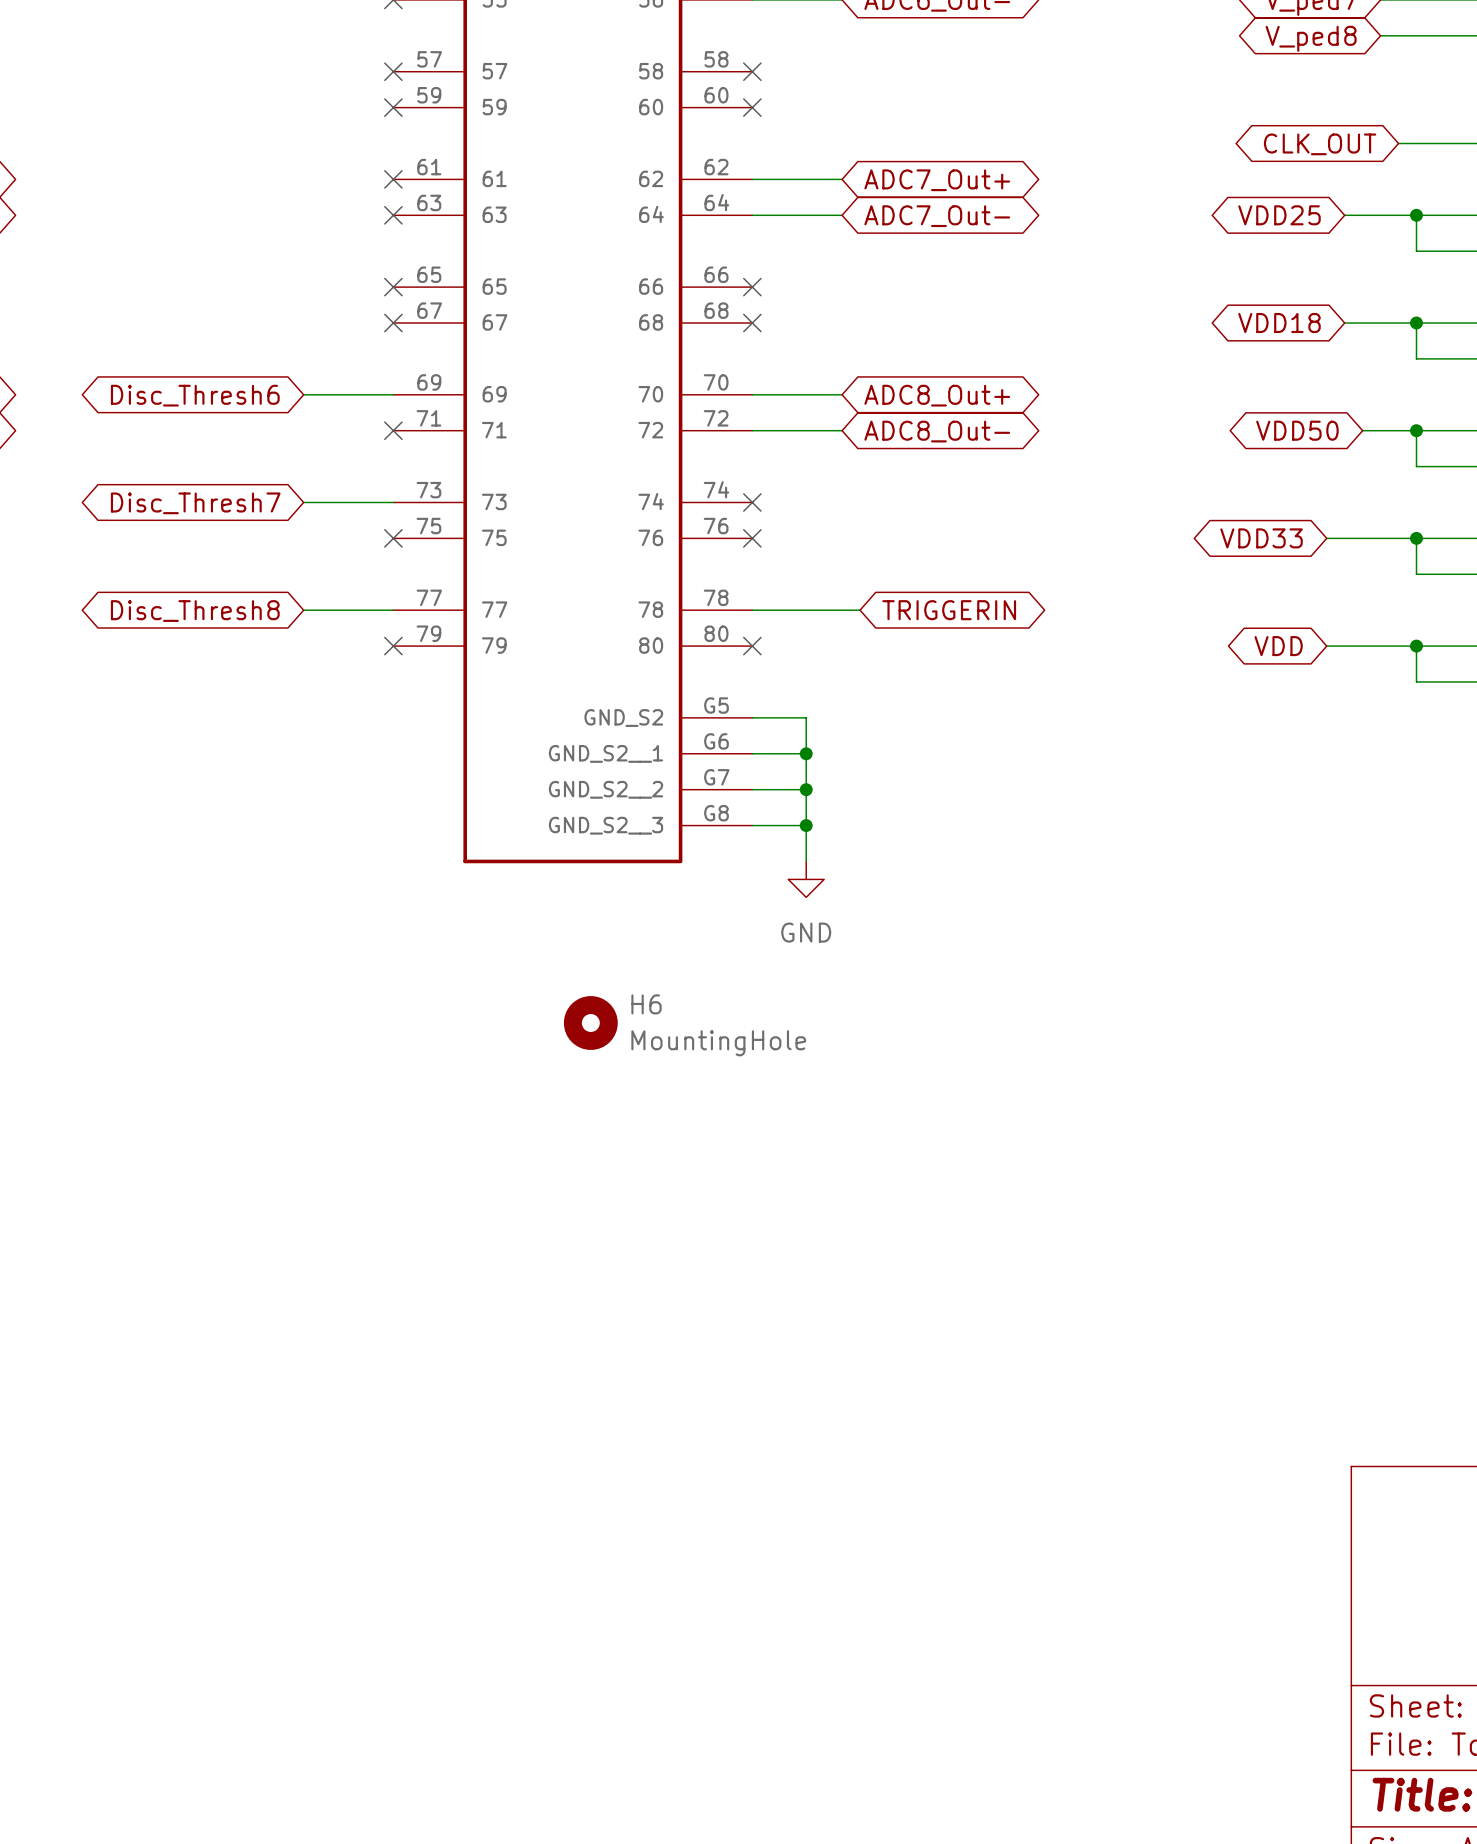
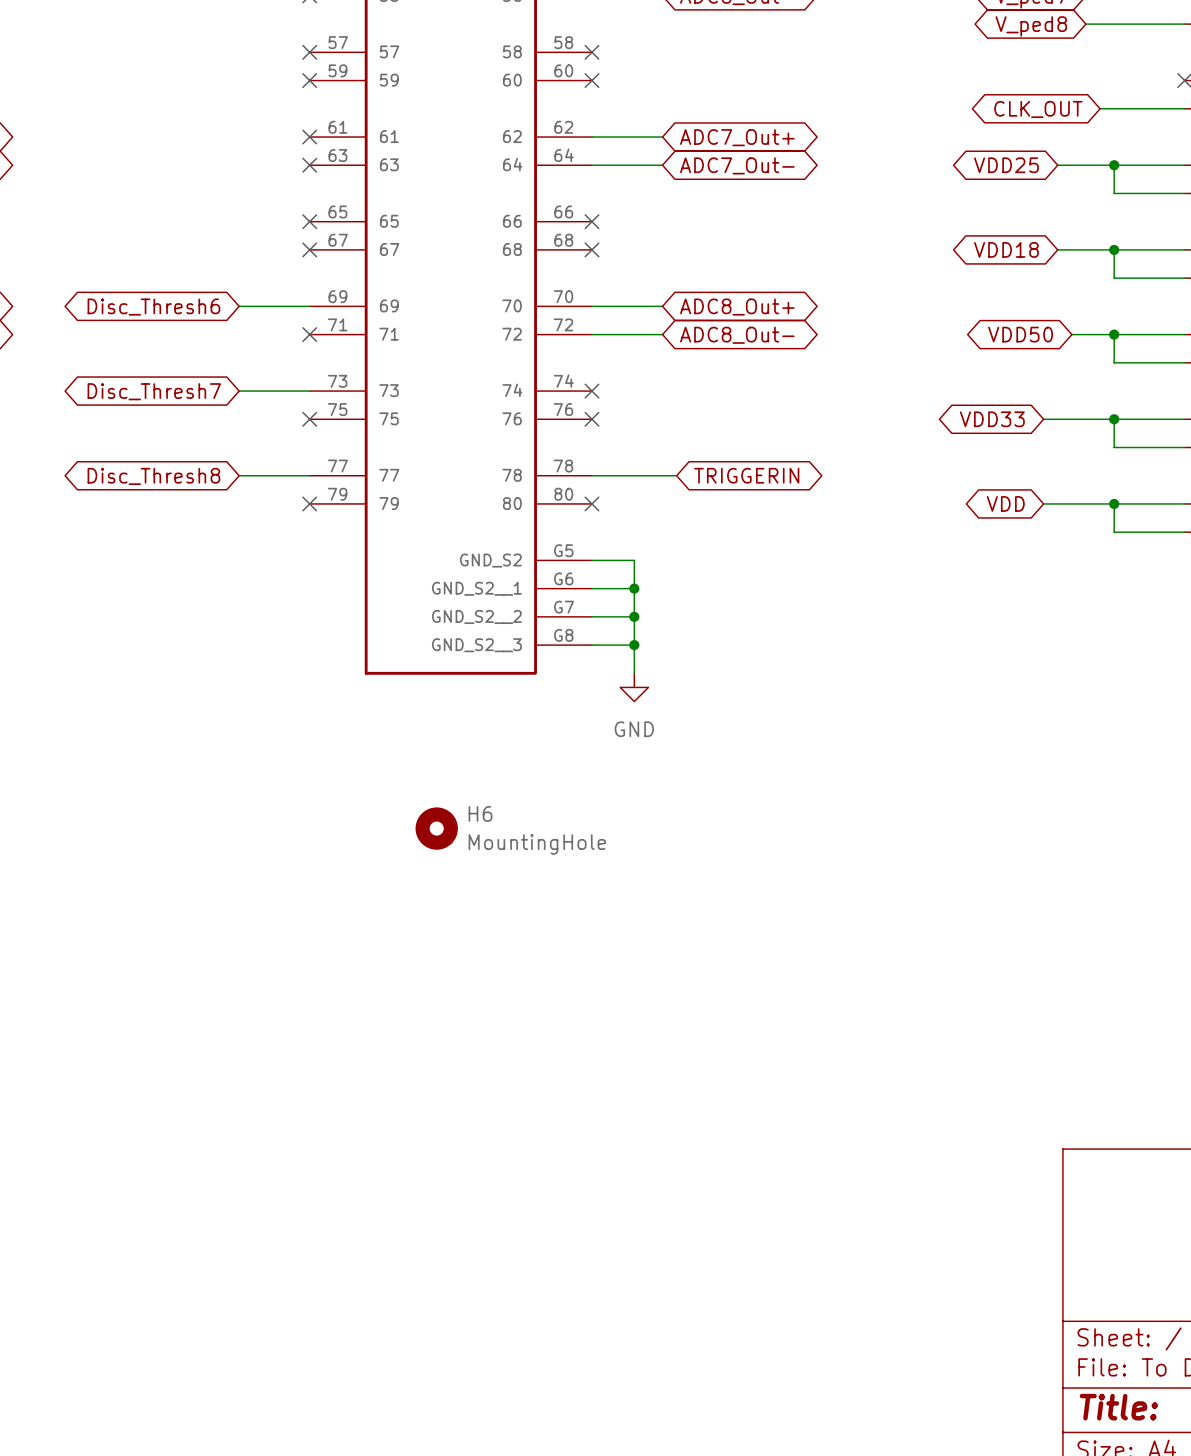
H6 position: (590, 1023) -> (436, 828)

